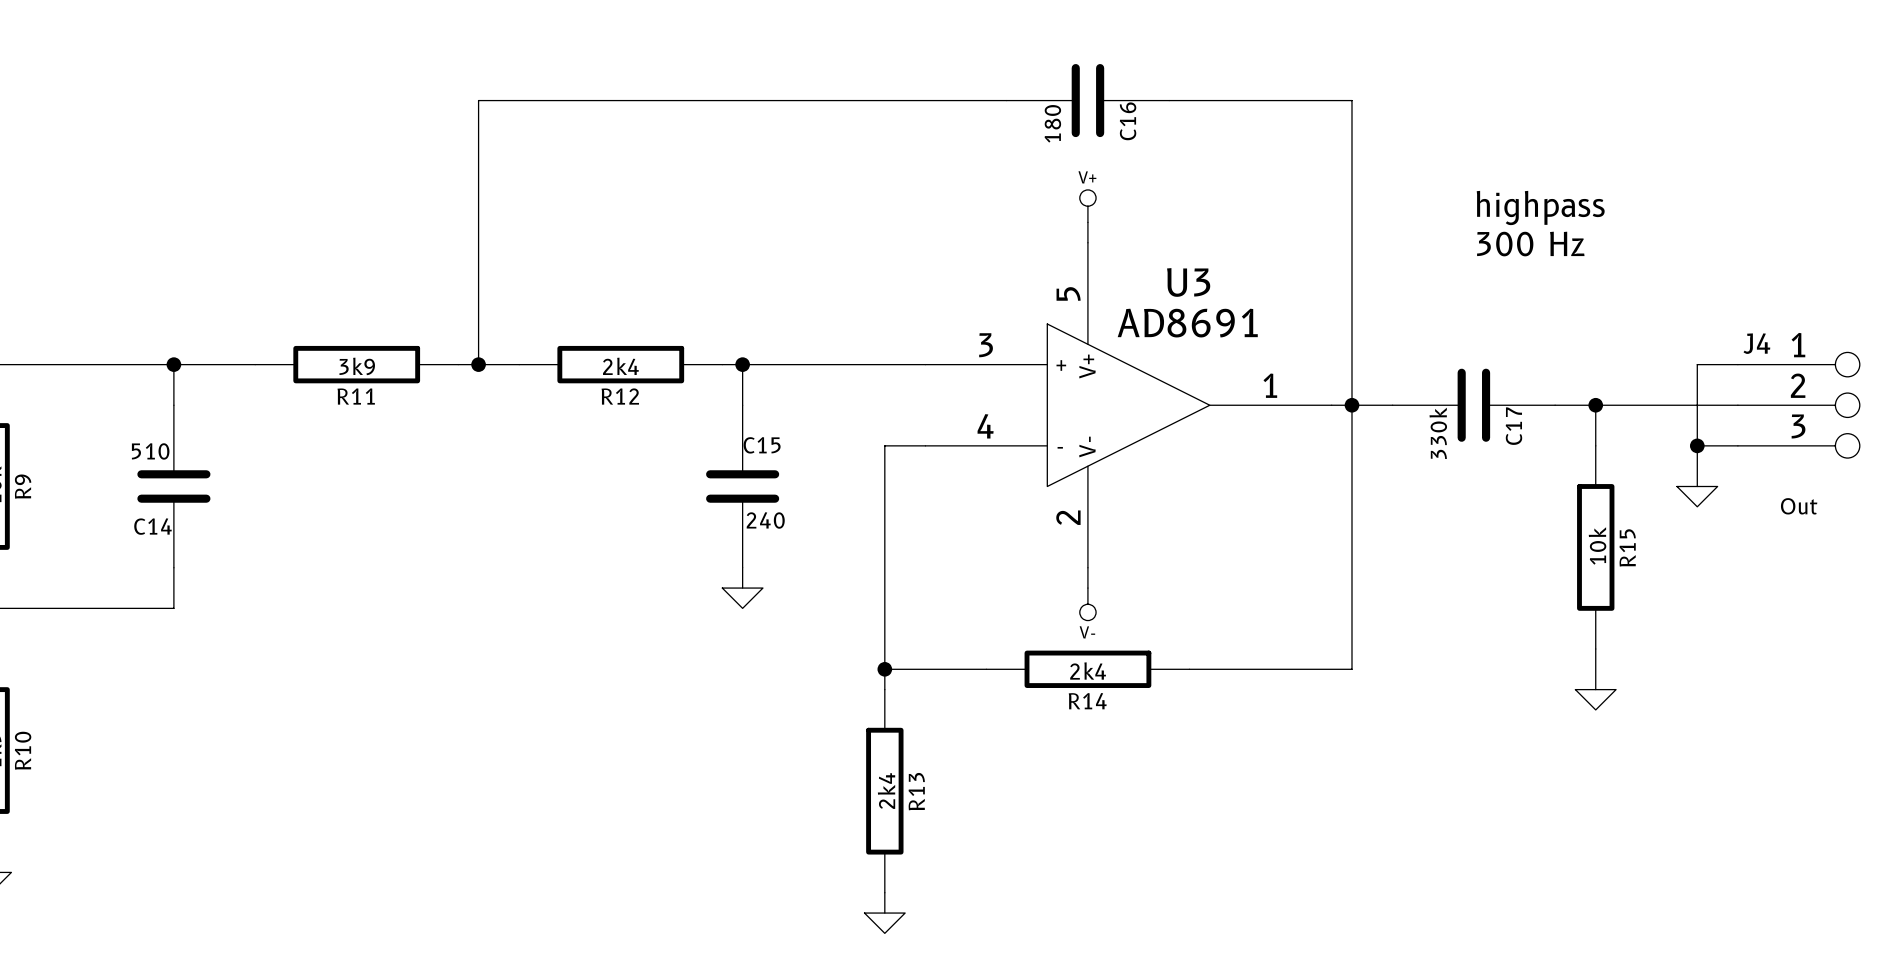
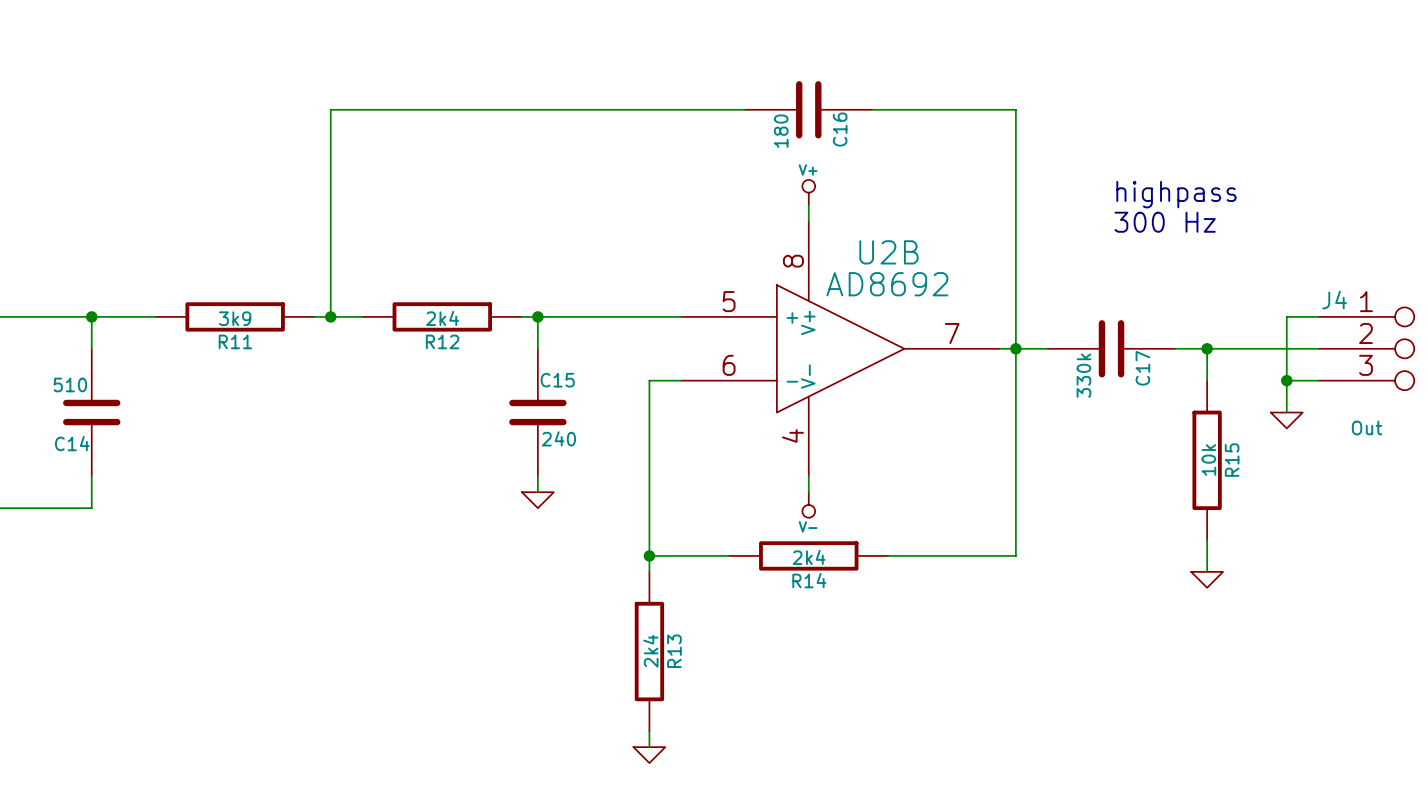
U3 name: U3 (1188, 282) -> U2B (888, 252)
U3 pin number: 5 (1068, 293) -> 8 (793, 261)
U3 value: AD8691 (1187, 323) -> AD8692 (887, 284)
U3 pin number: 3 (986, 345) -> 5 (729, 301)
U3 pin number: 1 (1270, 385) -> 7 (952, 333)
U3 pin number: 4 (985, 426) -> 6 (729, 365)
U3 pin number: 2 (1068, 517) -> 4 (792, 435)

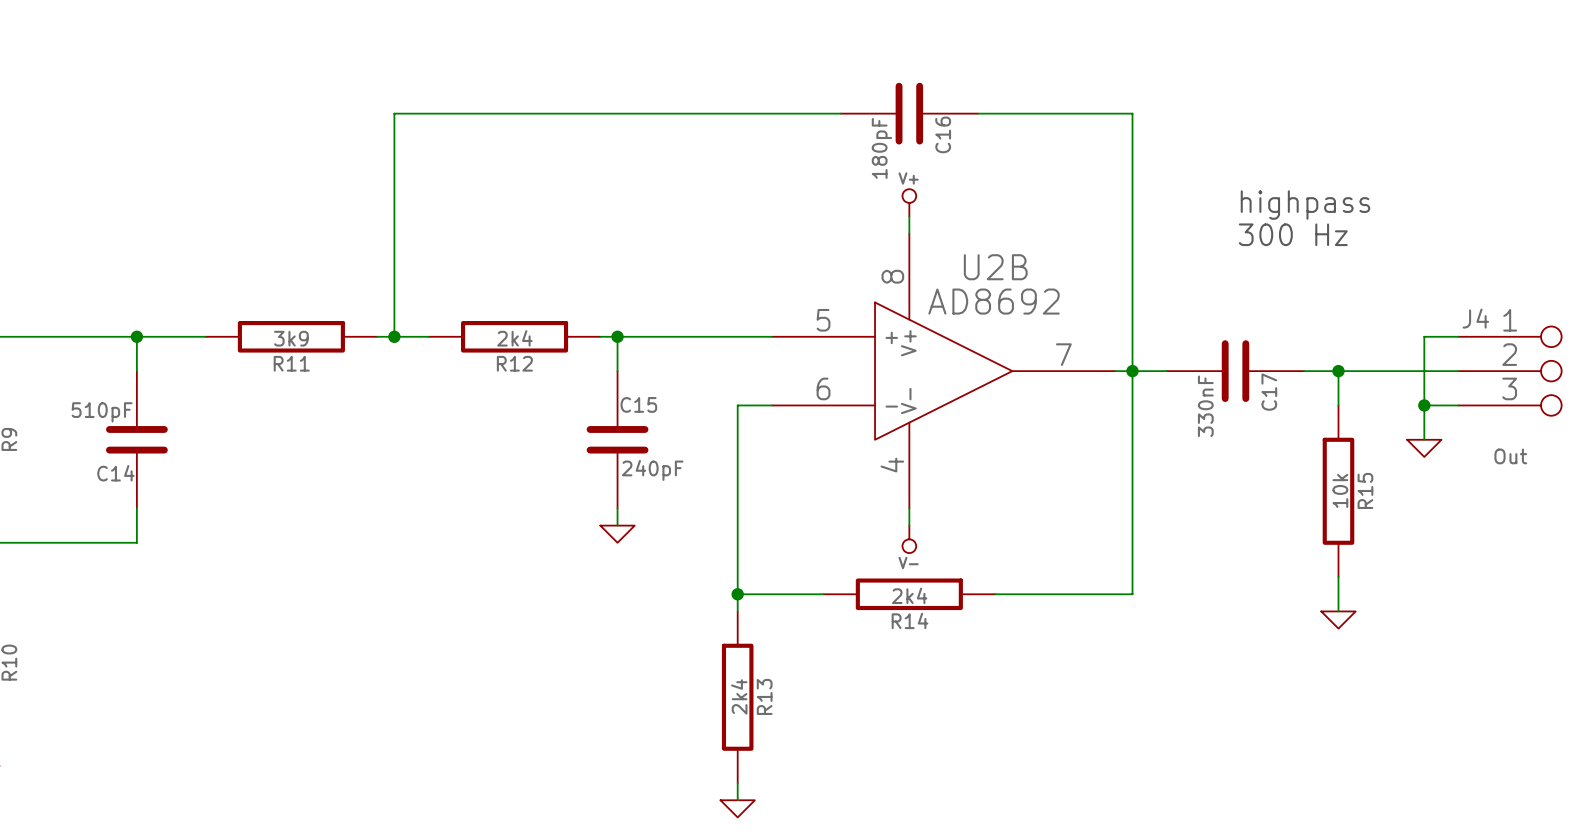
C16 value: 180 (781, 131) -> 180pF (881, 148)
C17 value: 330k (1083, 375) -> 330nF (1205, 406)
C14 value: 510 (70, 384) -> 510pF (102, 412)
C15 value: 240 (558, 438) -> 240pF (652, 470)

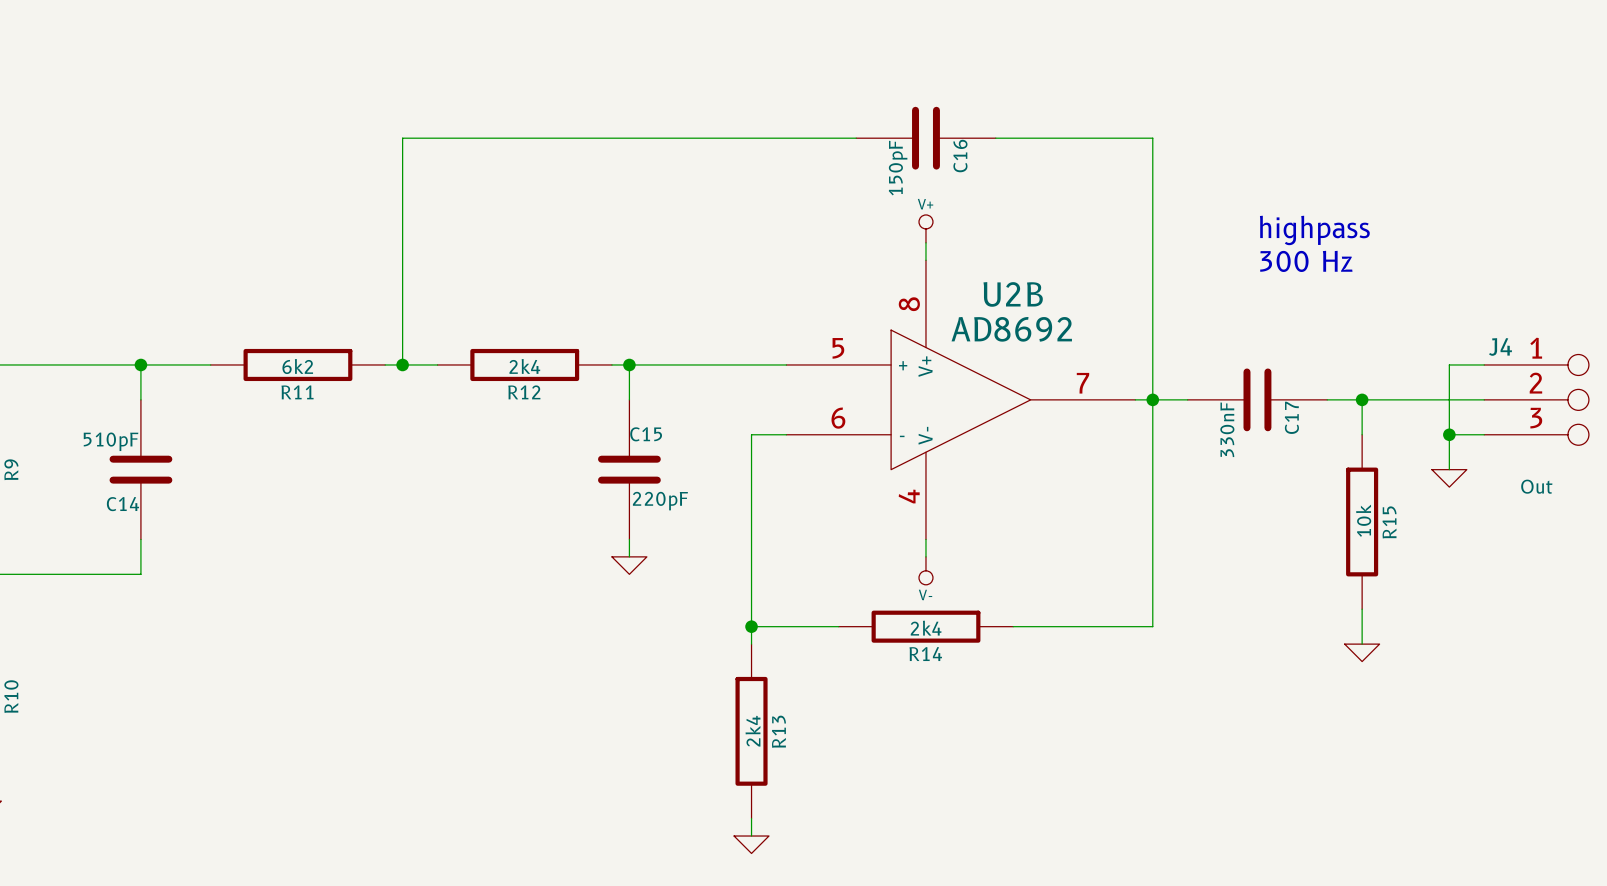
C16 value: 180pF (881, 148) -> 150pF (898, 168)
R11 value: 3k9 (291, 338) -> 6k2 (297, 366)
C15 value: 240pF (652, 470) -> 220pF (660, 501)

